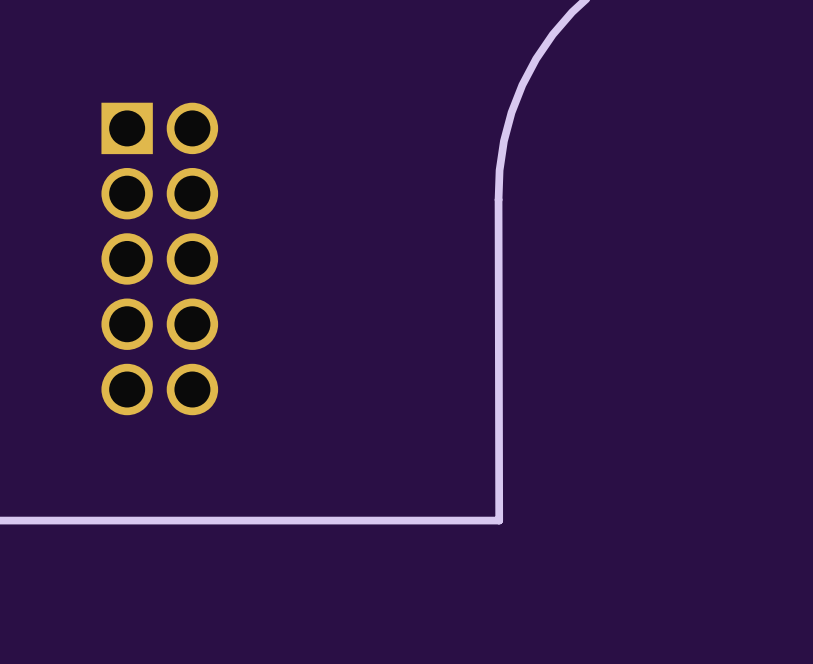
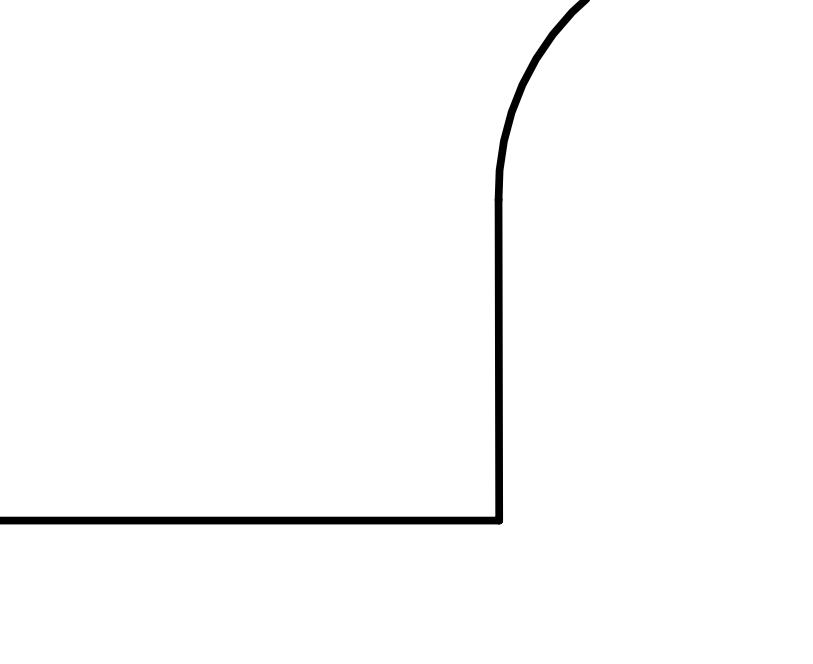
part: (159, 258) -> none

